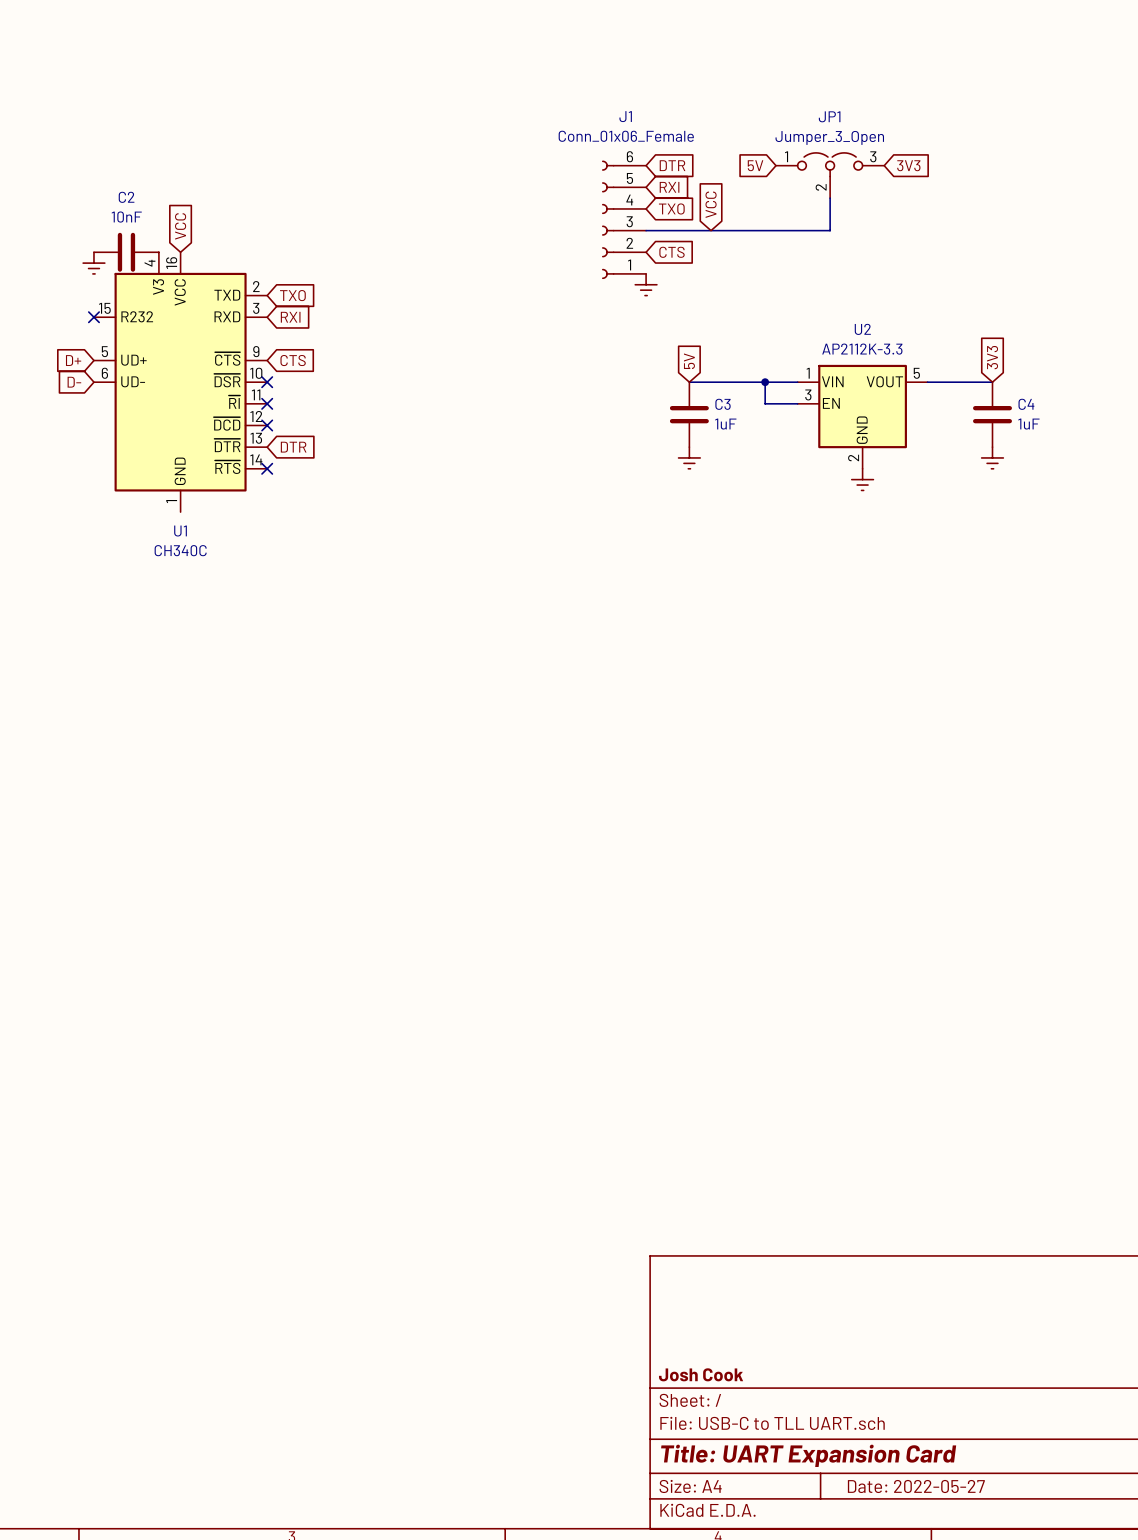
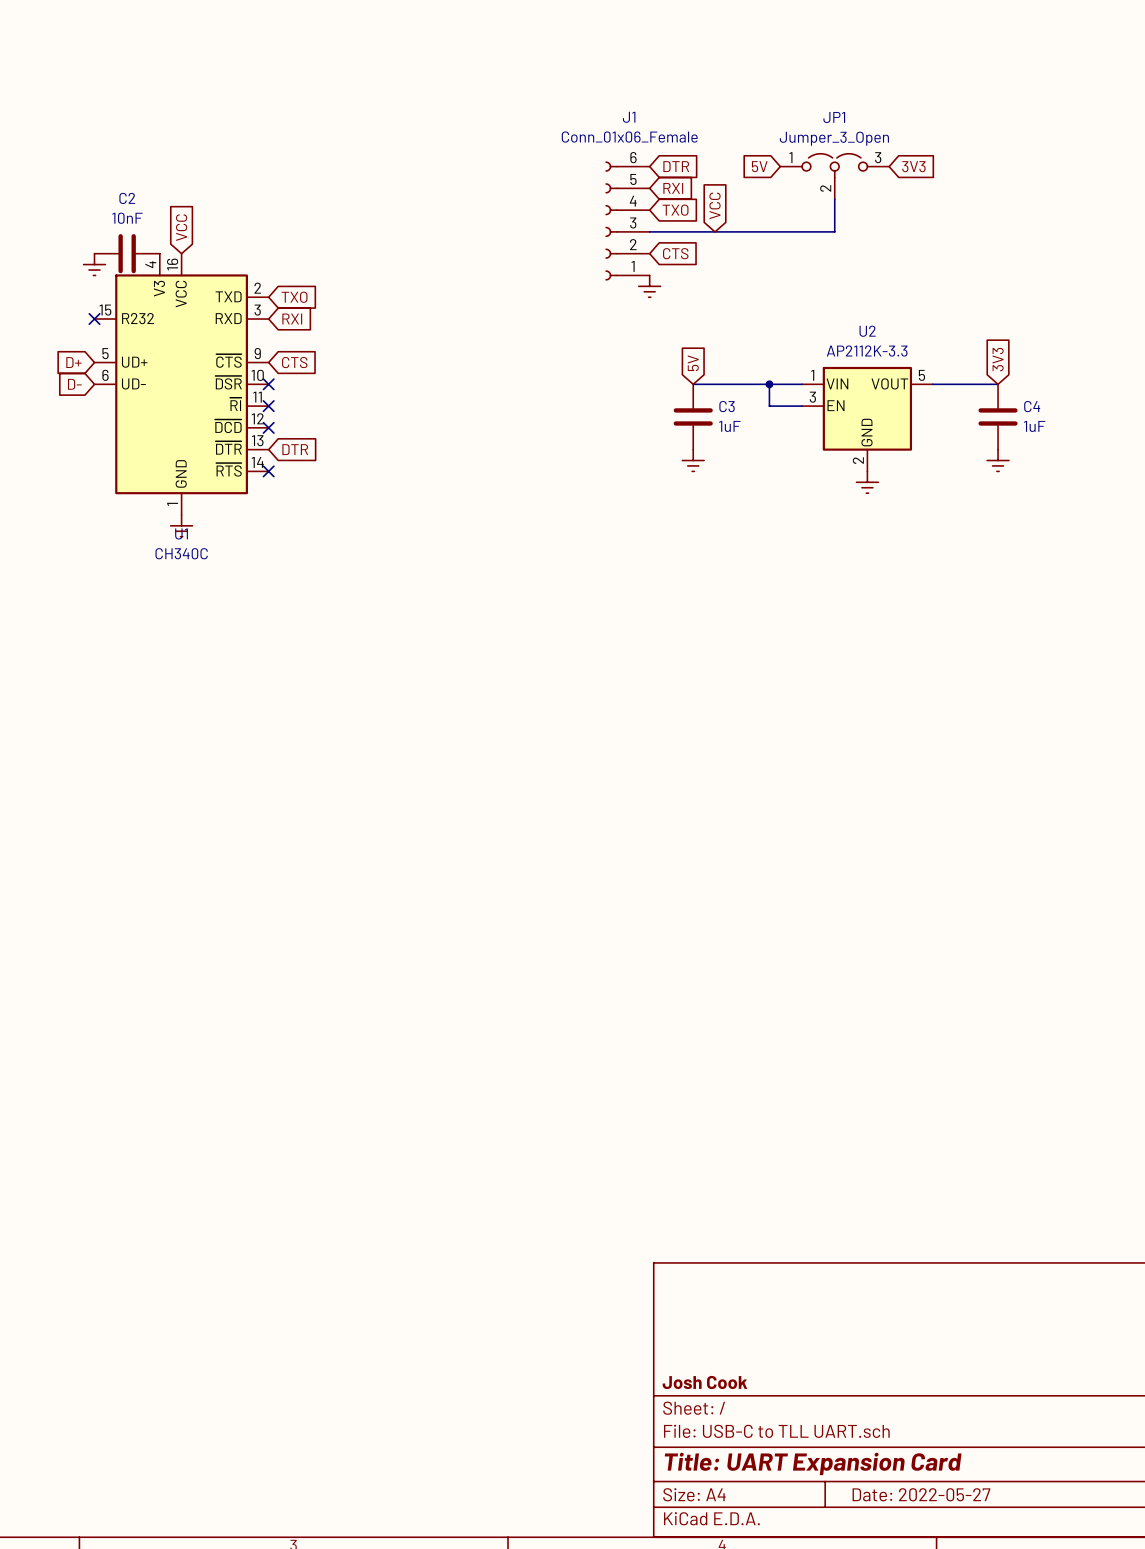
power symbol: none -> (181, 525)

